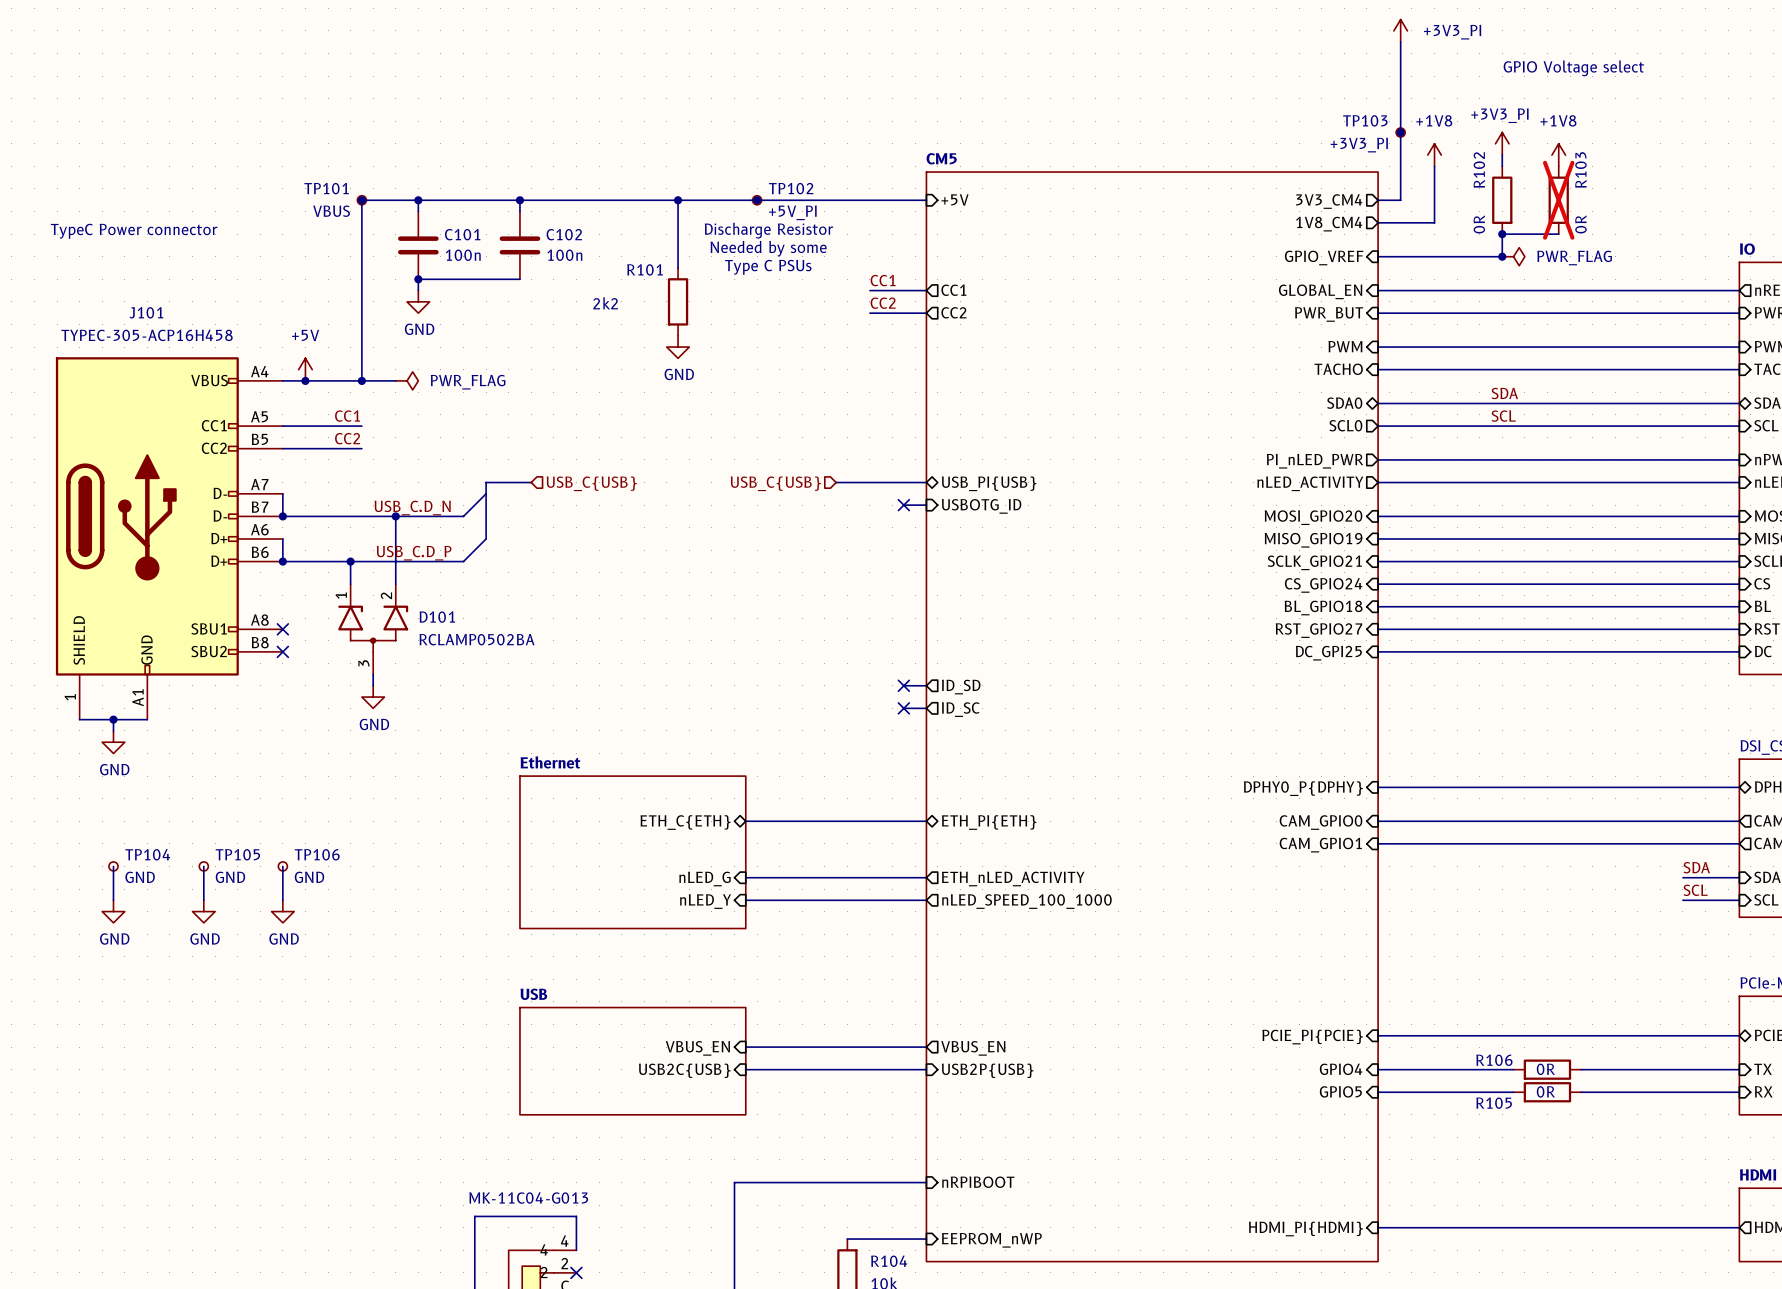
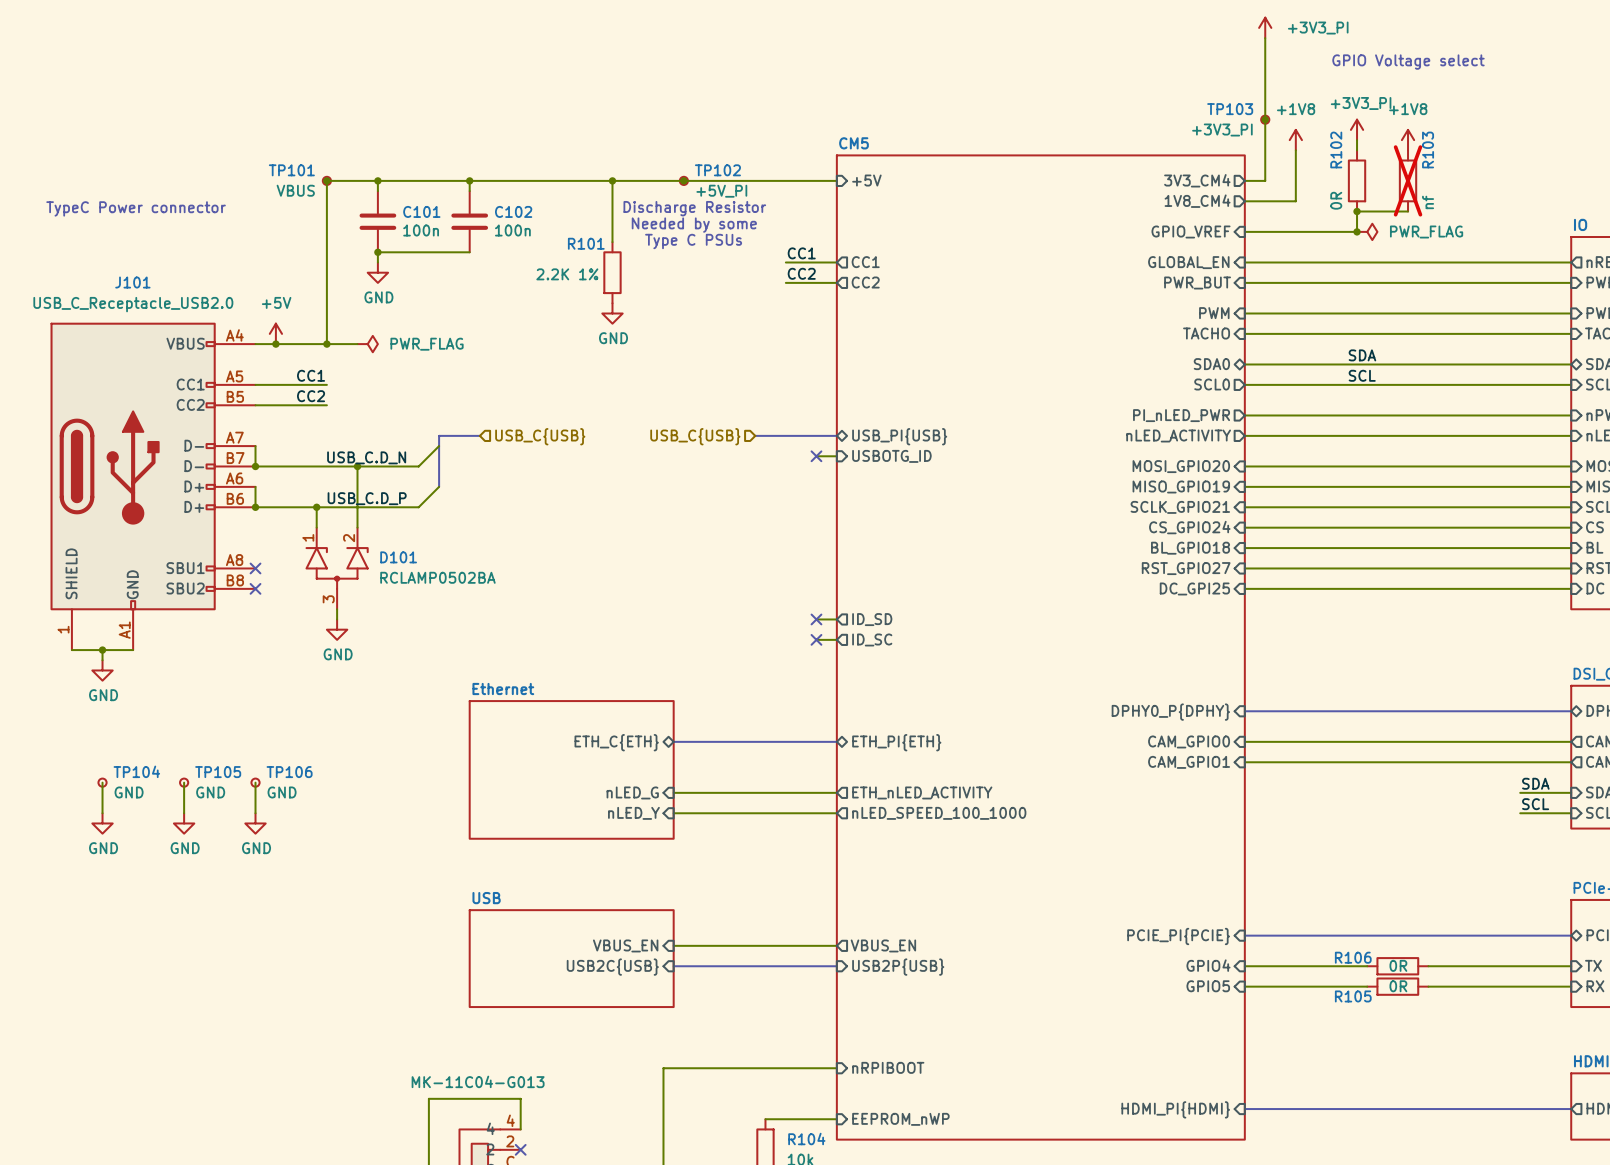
R103 value: 0R (1580, 224) -> nf (1428, 202)
R101 value: 2k2 (605, 303) -> 2.2K 1% (567, 274)
J101 value: TYPEC-305-ACP16H458 (147, 335) -> USB_C_Receptacle_USB2.0 (133, 304)

